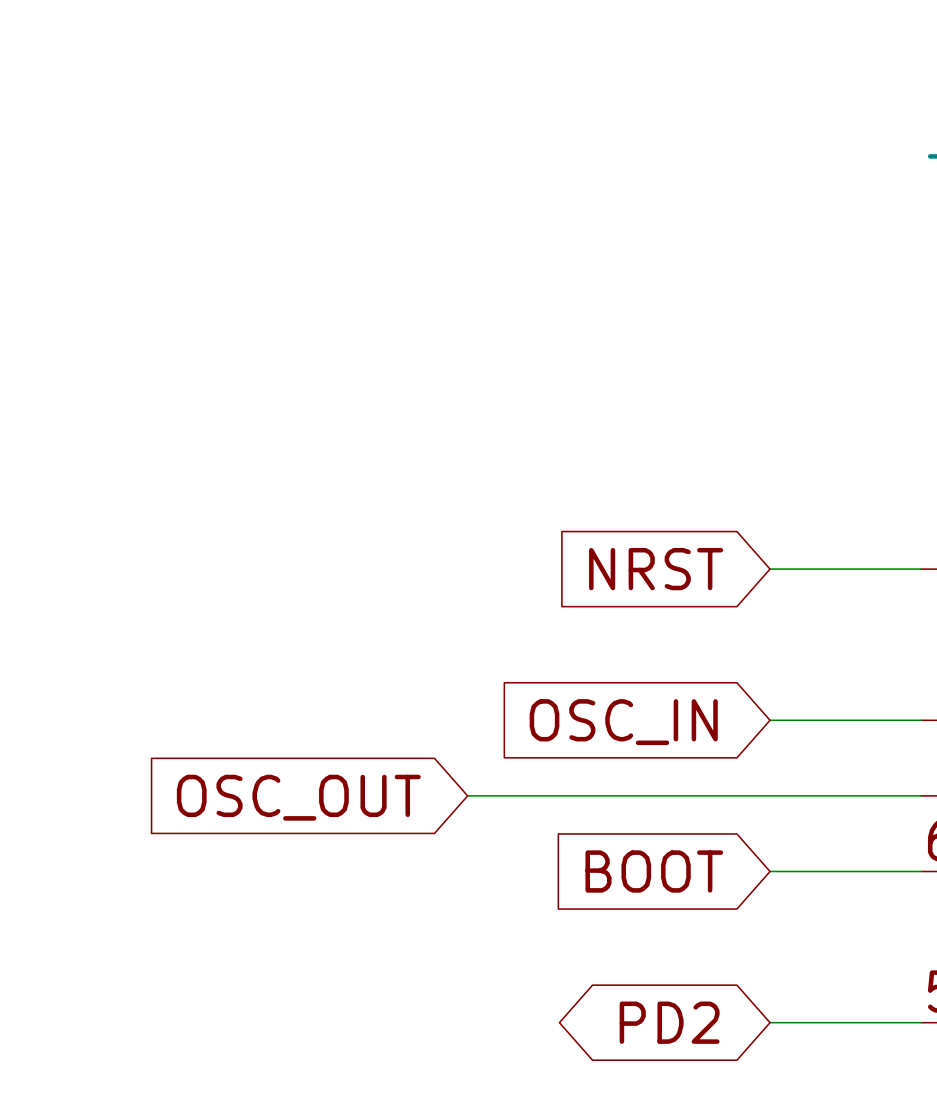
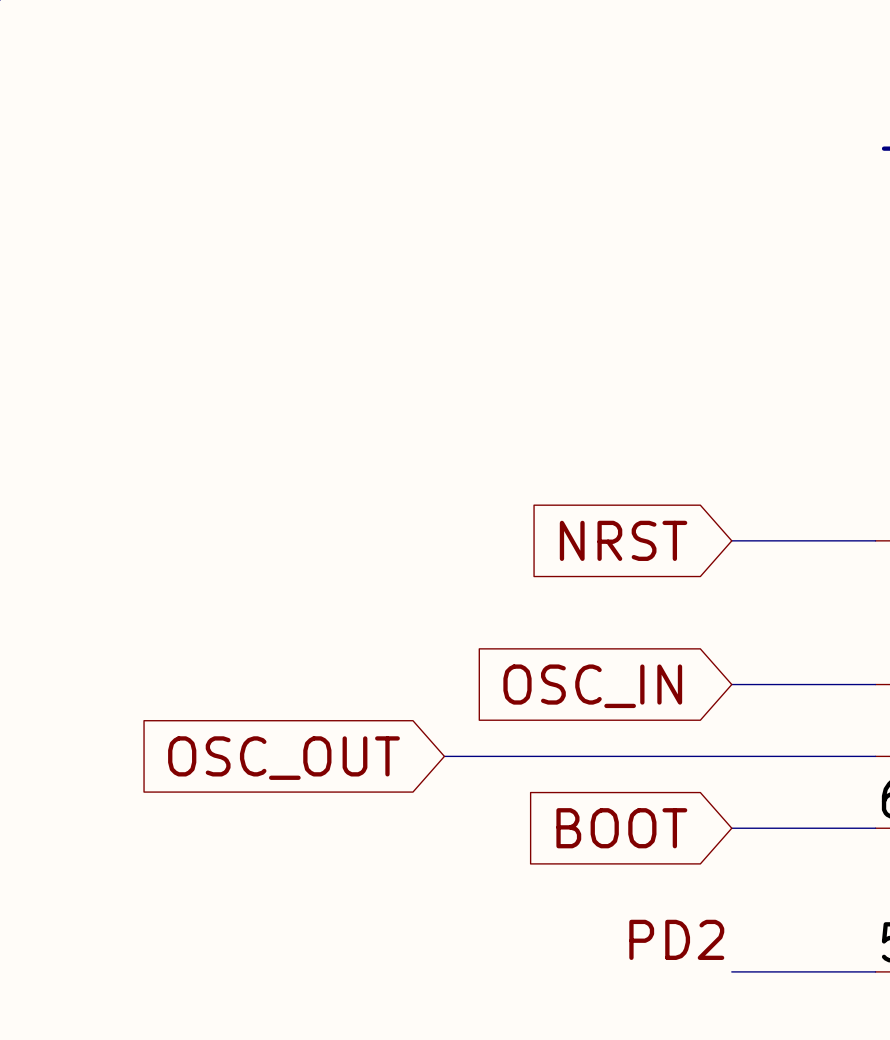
label: none -> PD2 (676, 939)
global label: PD2 (669, 1022) -> none

